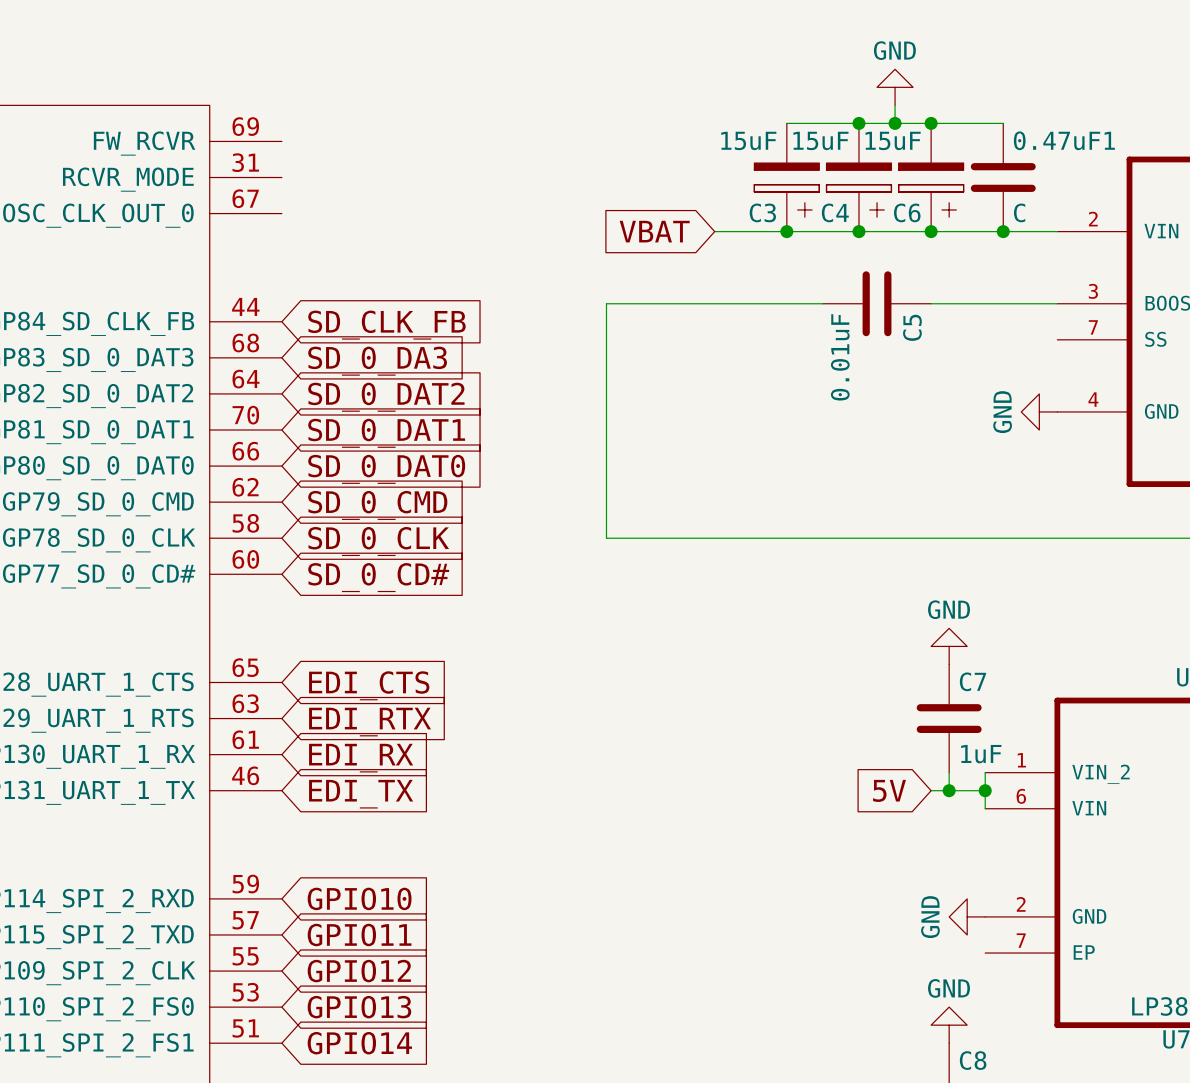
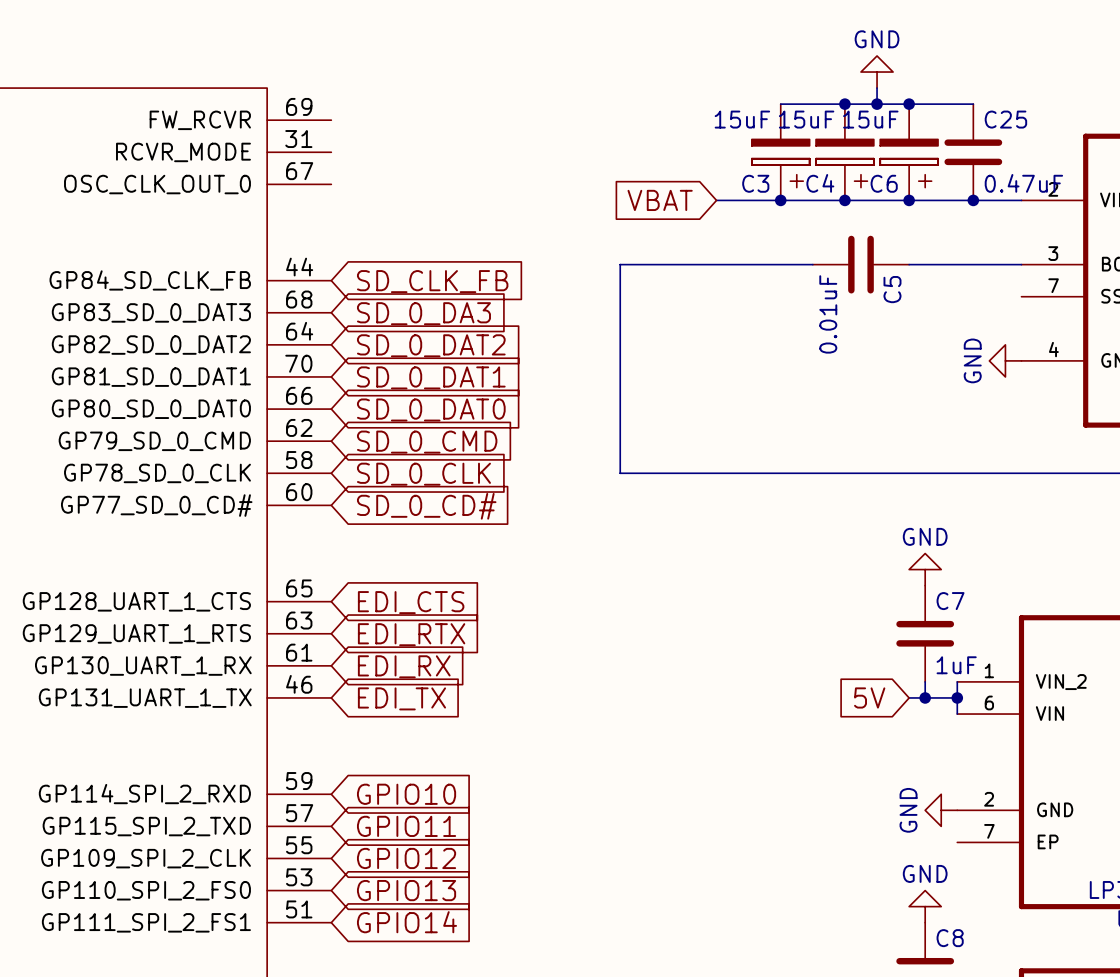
0.47uF1 name: 0.47uF1 (1064, 140) -> C25 (1005, 119)
0.47uF1 value: C (1019, 212) -> 0.47uF (1023, 183)

